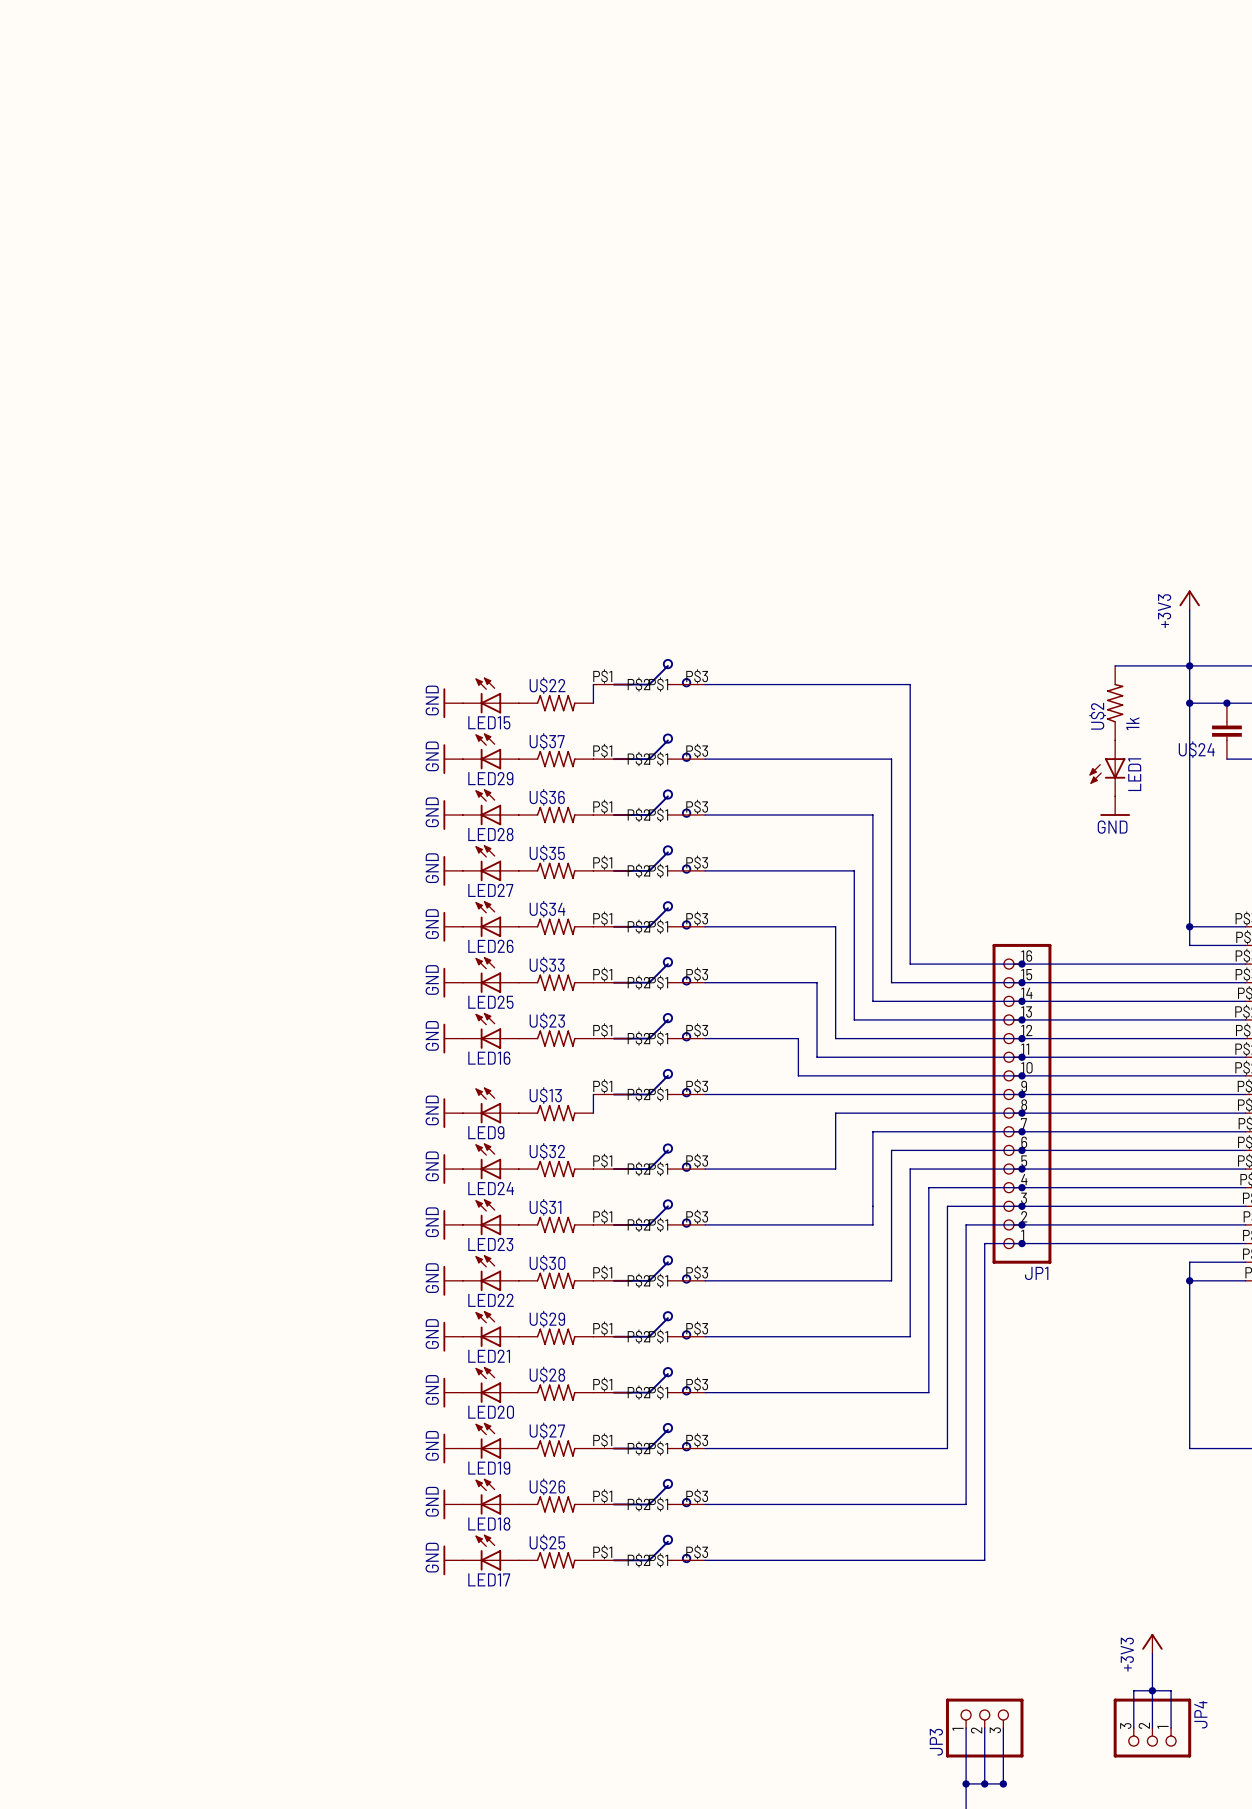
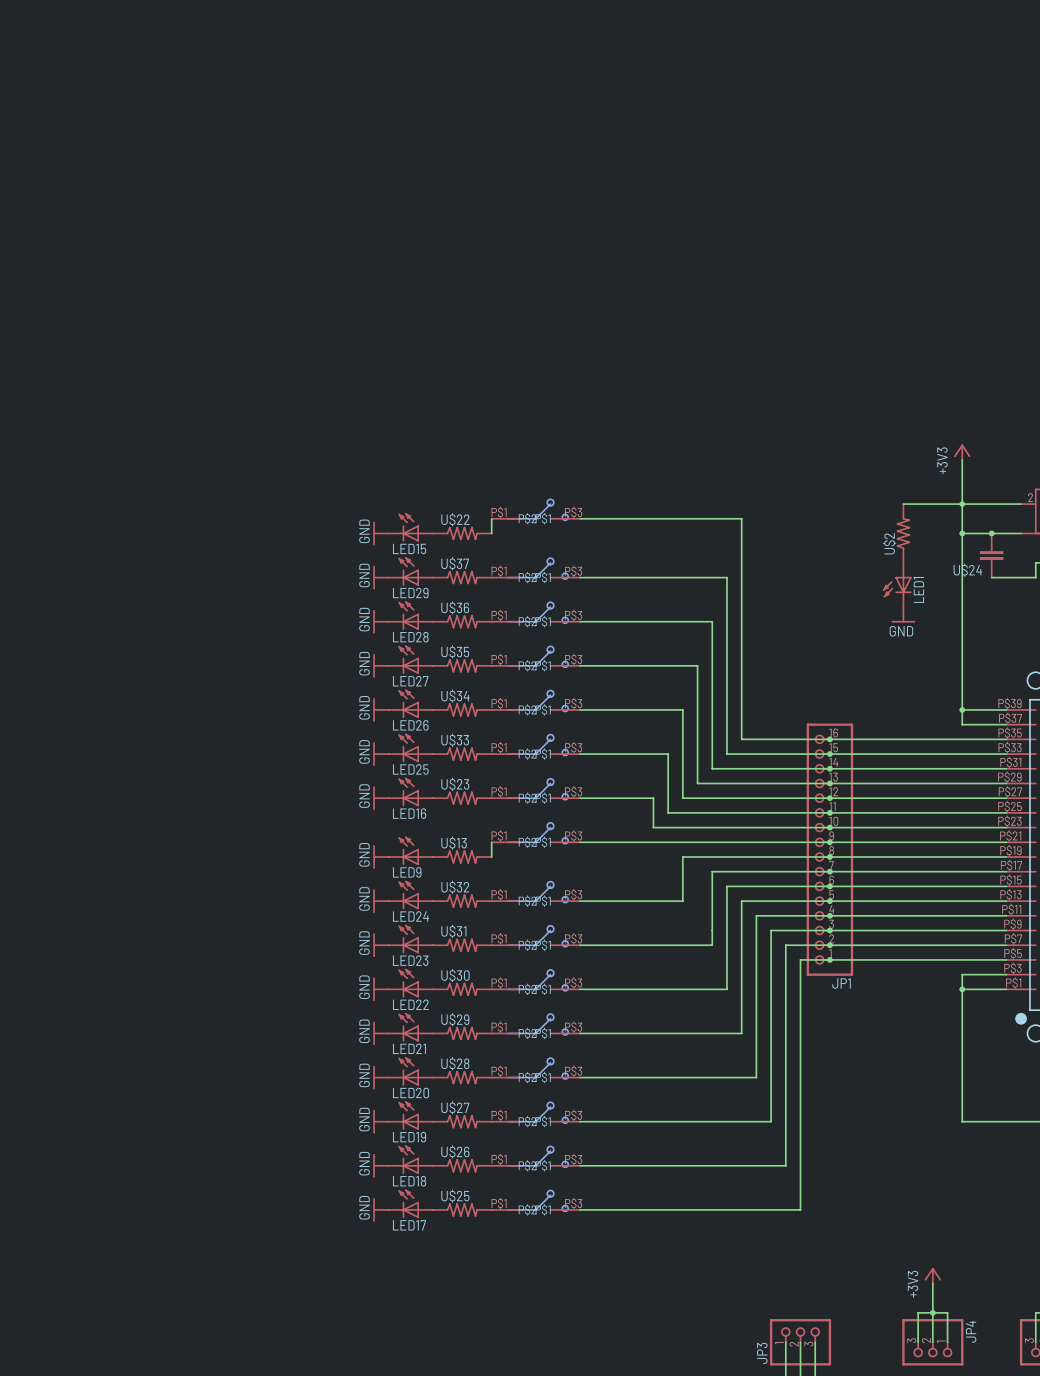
U$2 value: 1k (1132, 723) -> none

